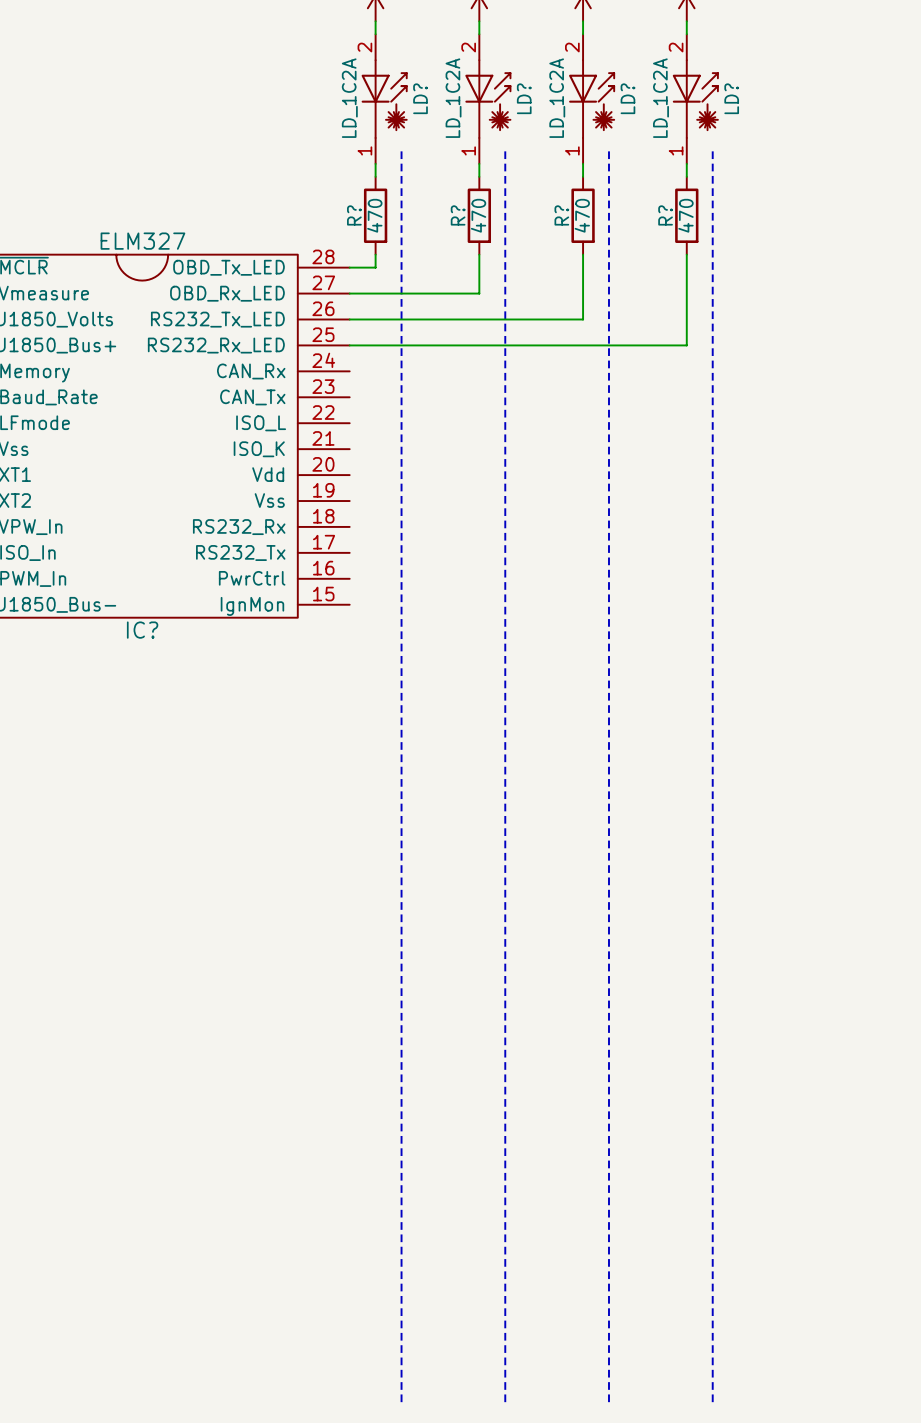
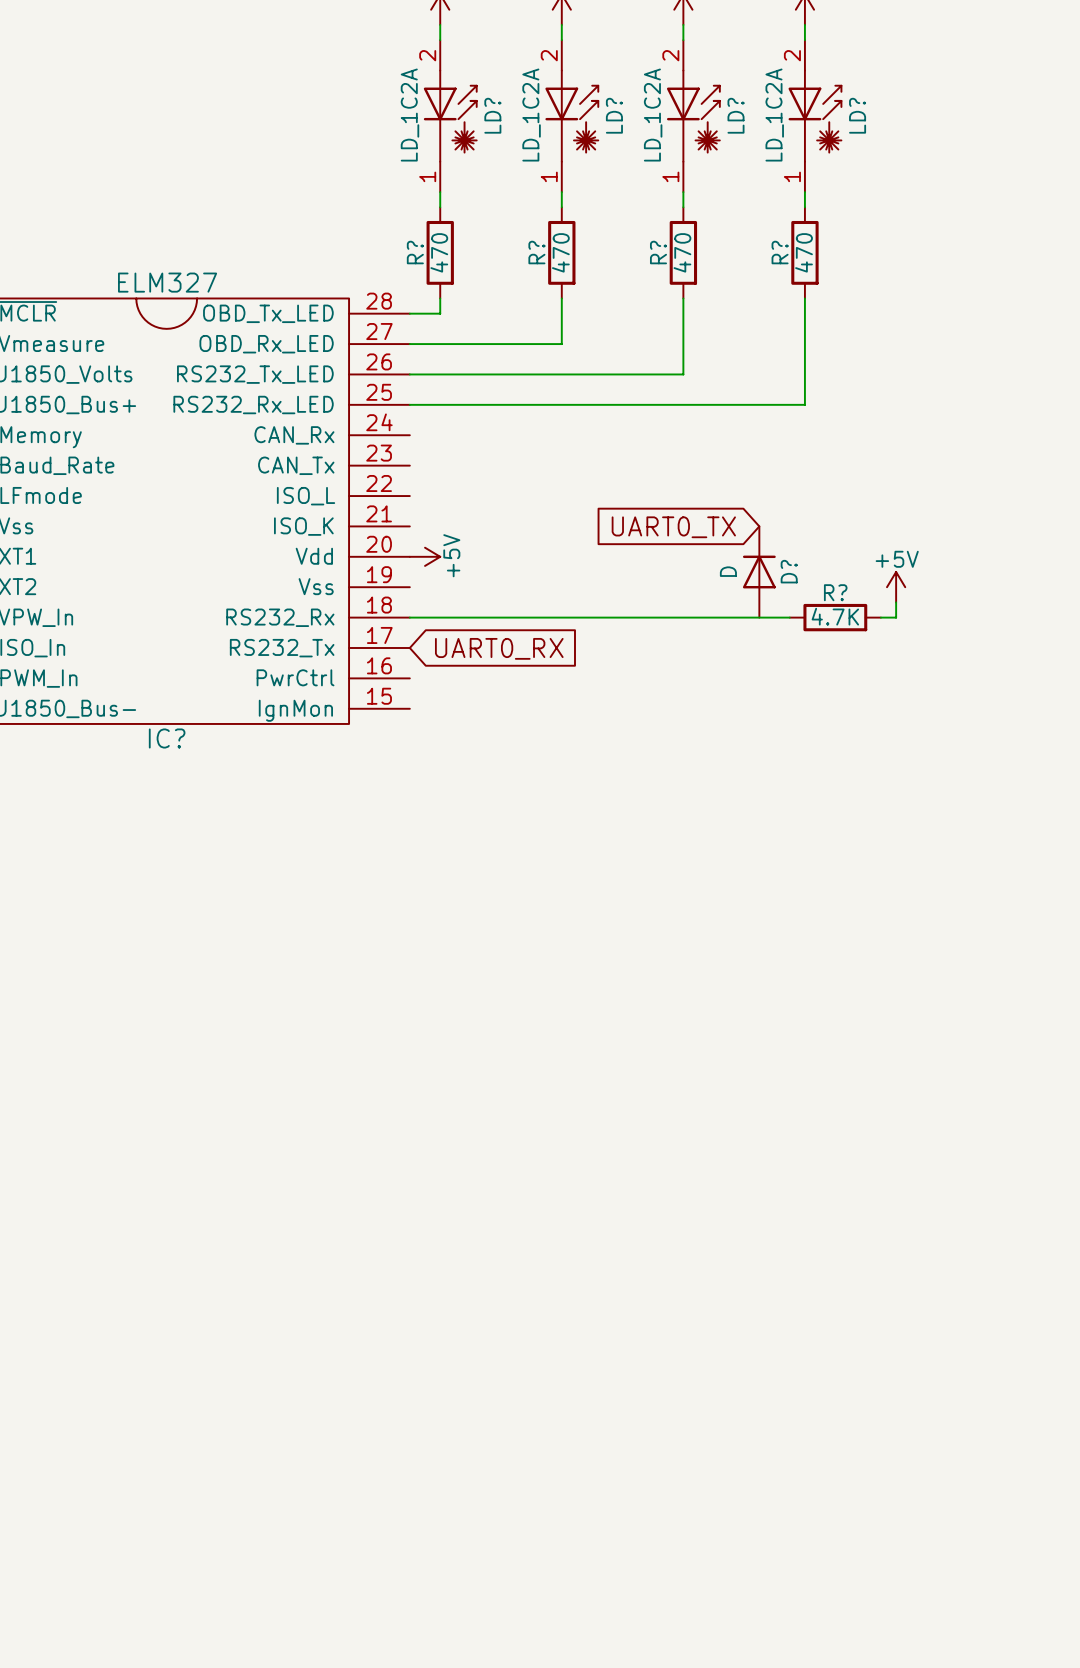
line: (401, 150) (401, 1402) -> none
line: (505, 150) (505, 1402) -> none
line: (608, 150) (608, 1402) -> none
line: (712, 150) (712, 1402) -> none
global label: none -> UART0_TX (673, 527)
power symbol: none -> +5V (425, 556)
D?: none -> D (759, 572)
power symbol: none -> +5V (896, 587)
wire: none -> (896, 602) (896, 617) (880, 617)
wire: none -> (409, 617) (789, 617)
R?: none -> 4.7K (835, 617)
global label: none -> UART0_RX (499, 648)

